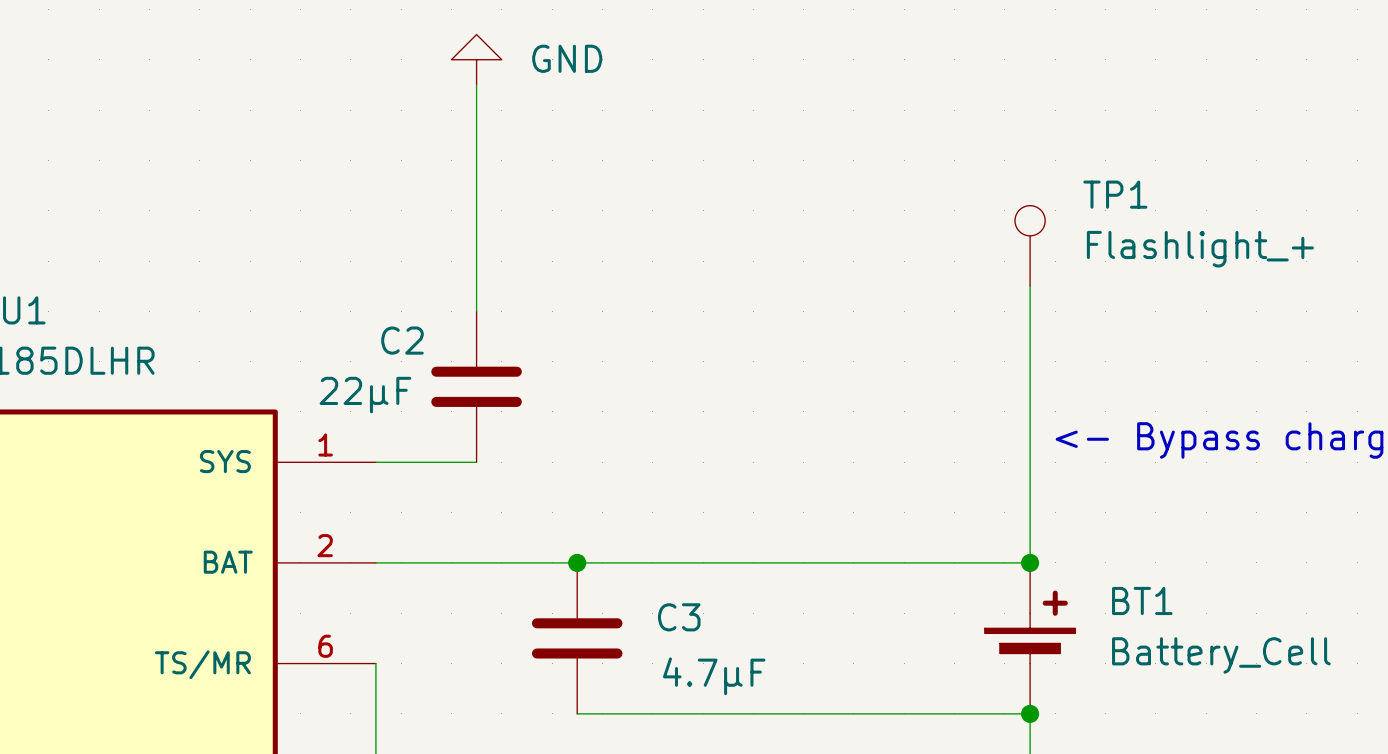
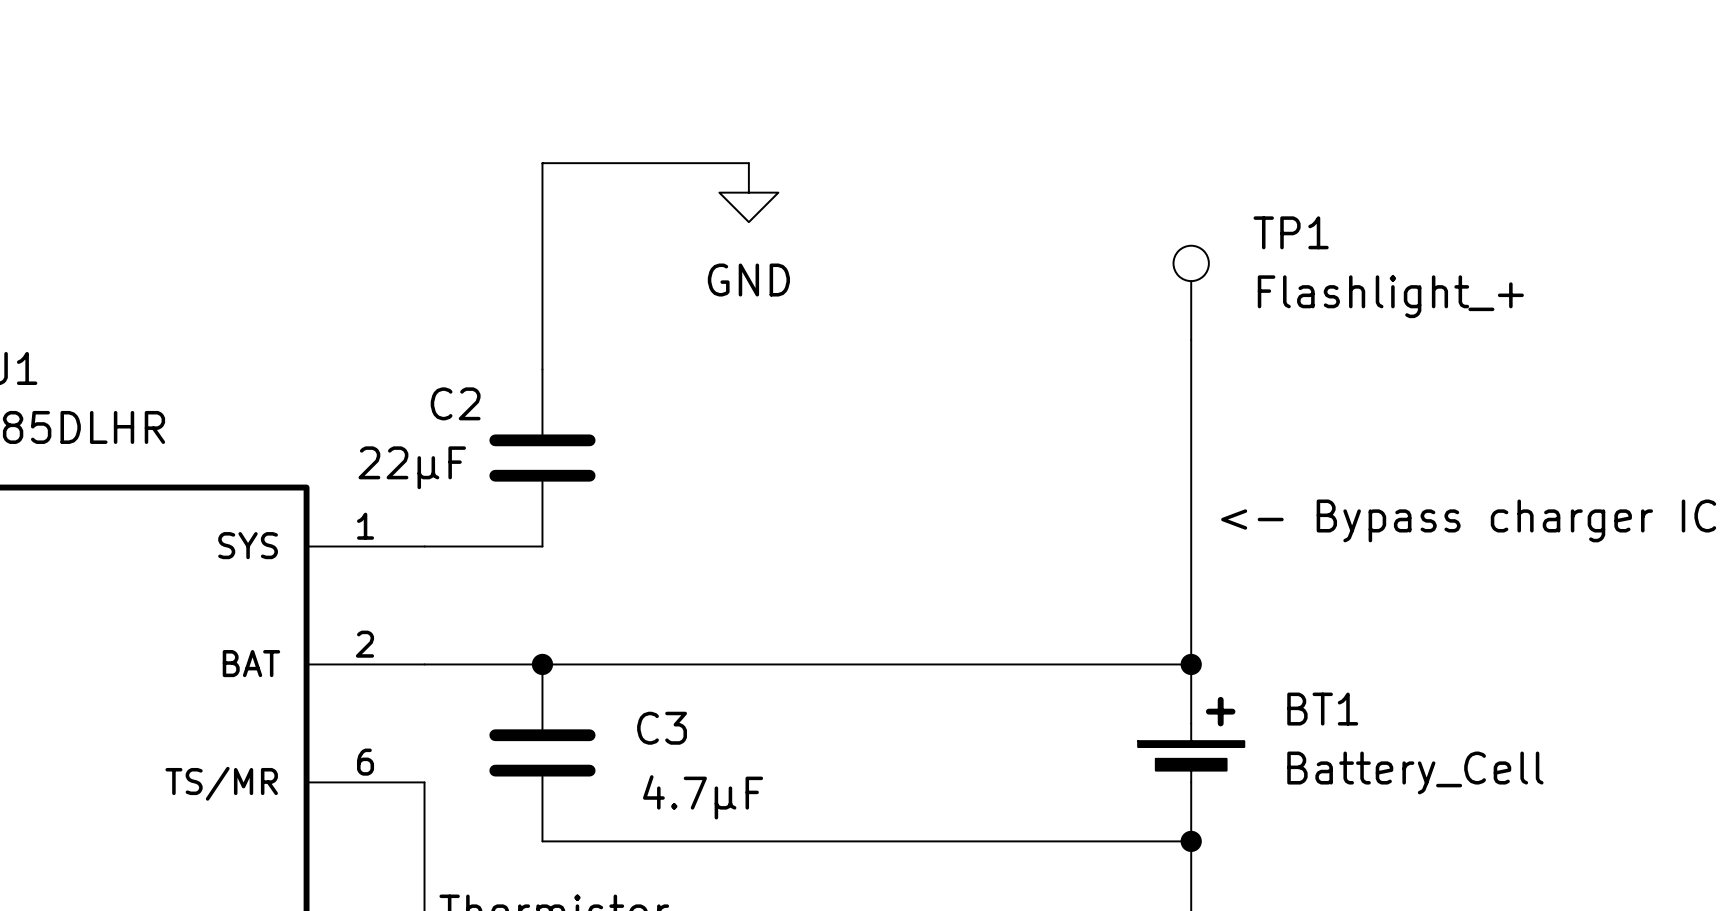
power symbol text position: GND (567, 58) -> GND (748, 280)
power symbol rotation: 0° (476, 59) -> 180° (748, 192)
power symbol position: GND (476, 59) -> GND (748, 192)
wire: (476, 84) (476, 135) -> (748, 163) (542, 163)
junction position: (577, 562) -> (542, 664)
C3 position: (577, 638) -> (542, 752)
wire: none -> (542, 841) (660, 841)

